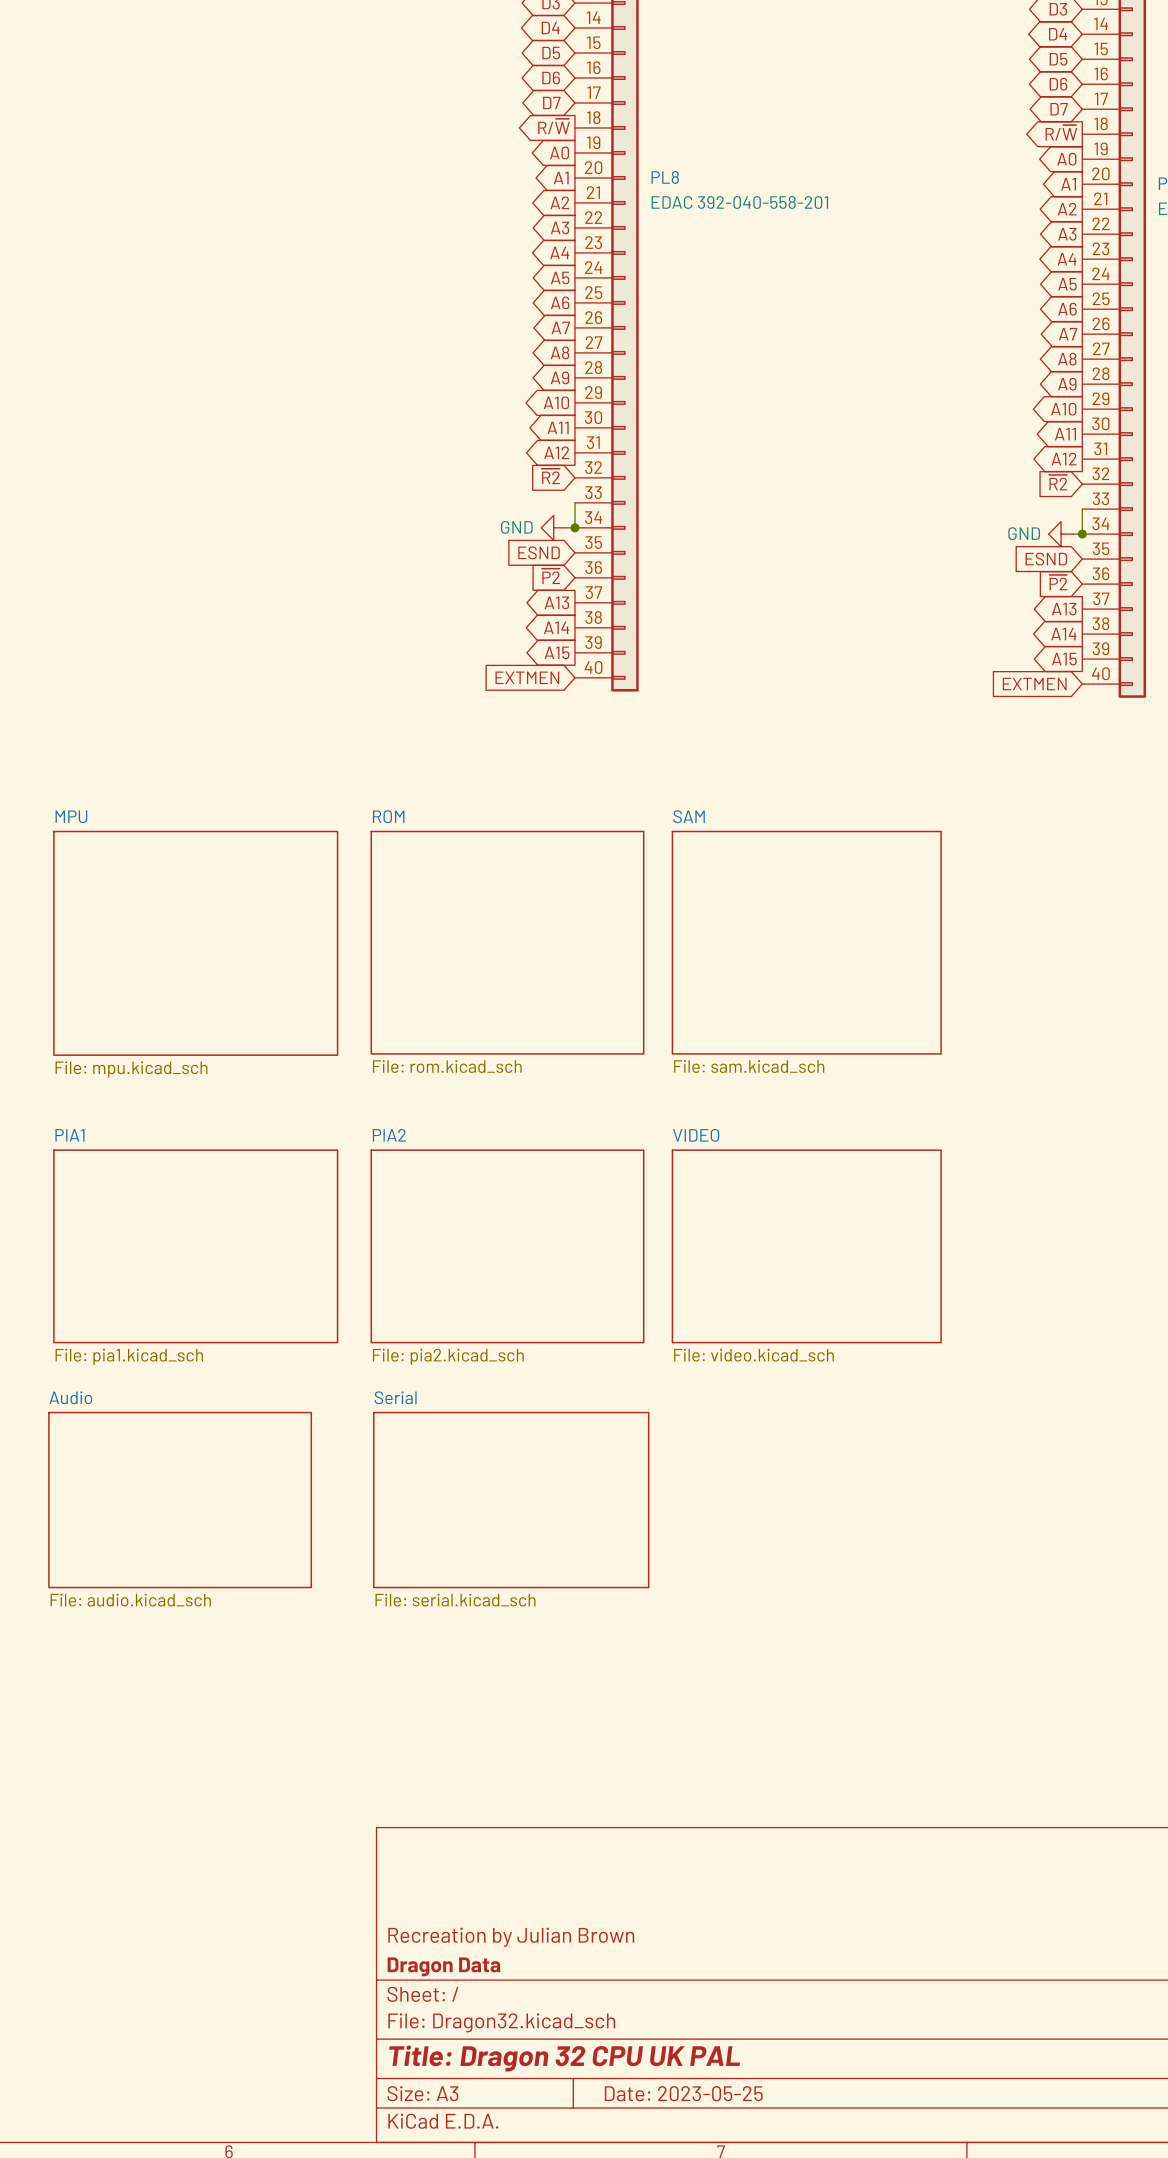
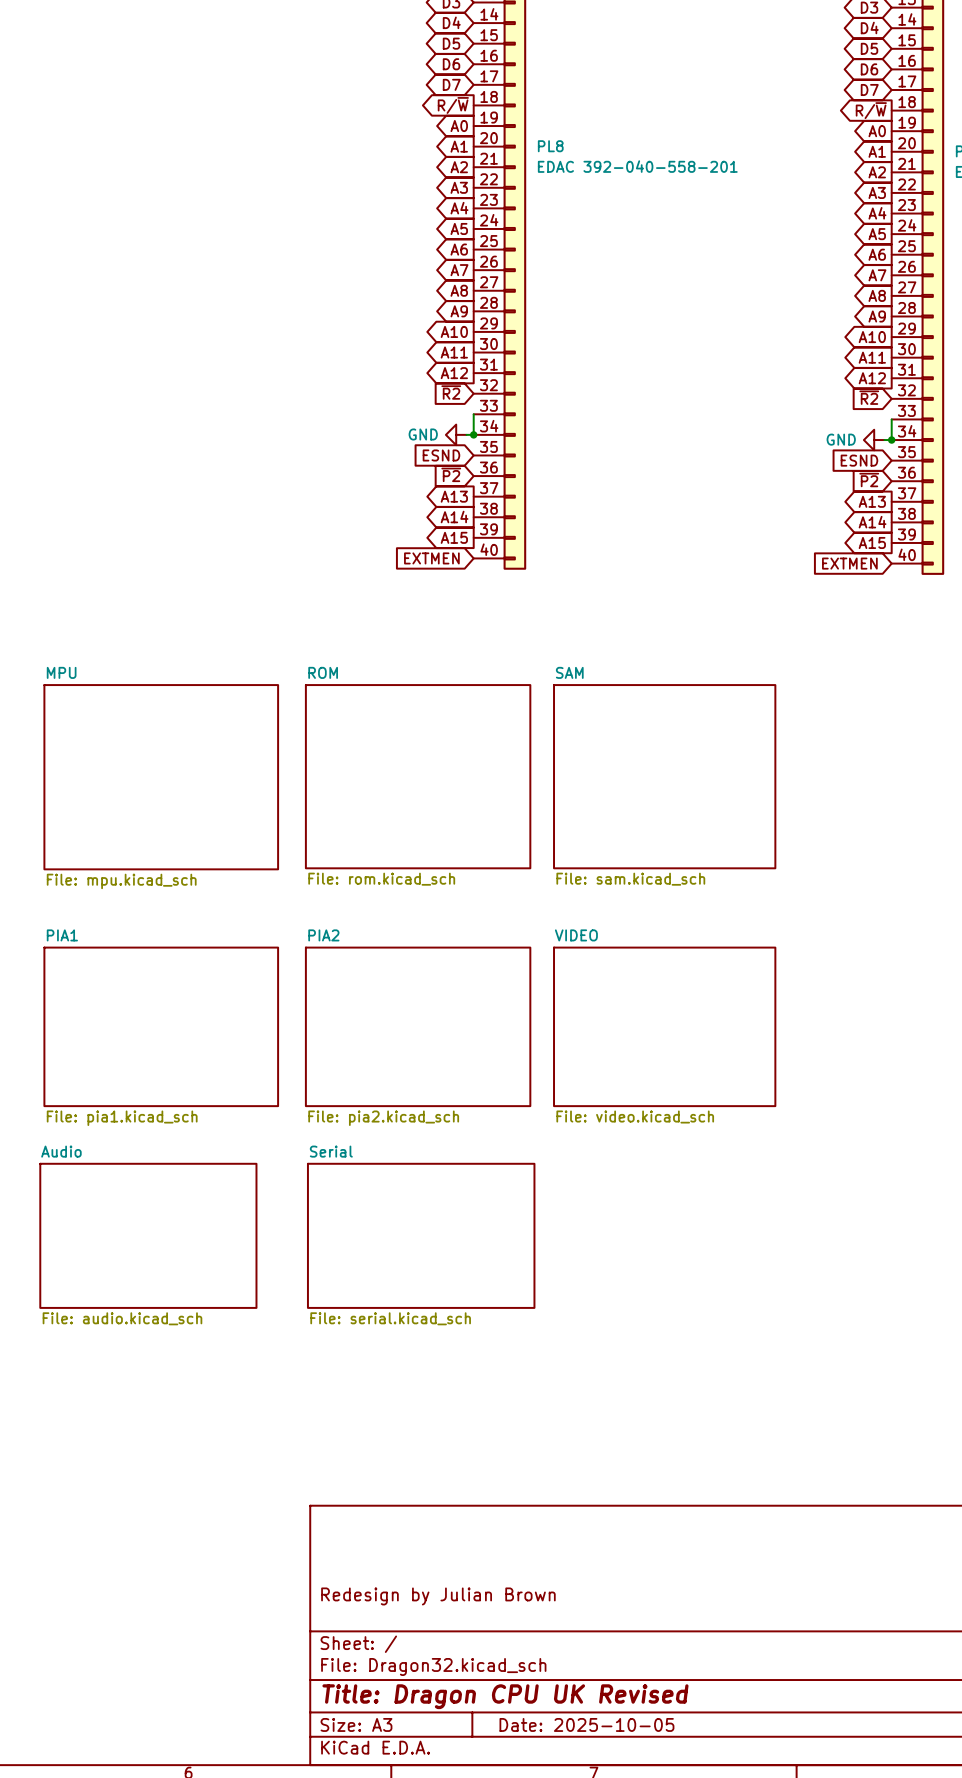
title block: Recreation by Julian Brown (511, 1937) -> Redesign by Julian Brown (438, 1596)
title block: Dragon Data (443, 1966) -> none
title block: Title: Dragon 32 CPU UK PAL (564, 2058) -> Title: Dragon CPU UK Revised (505, 1696)
title block: Date: 2023-05-25 (683, 2093) -> Date: 2025-10-05 (586, 1724)

